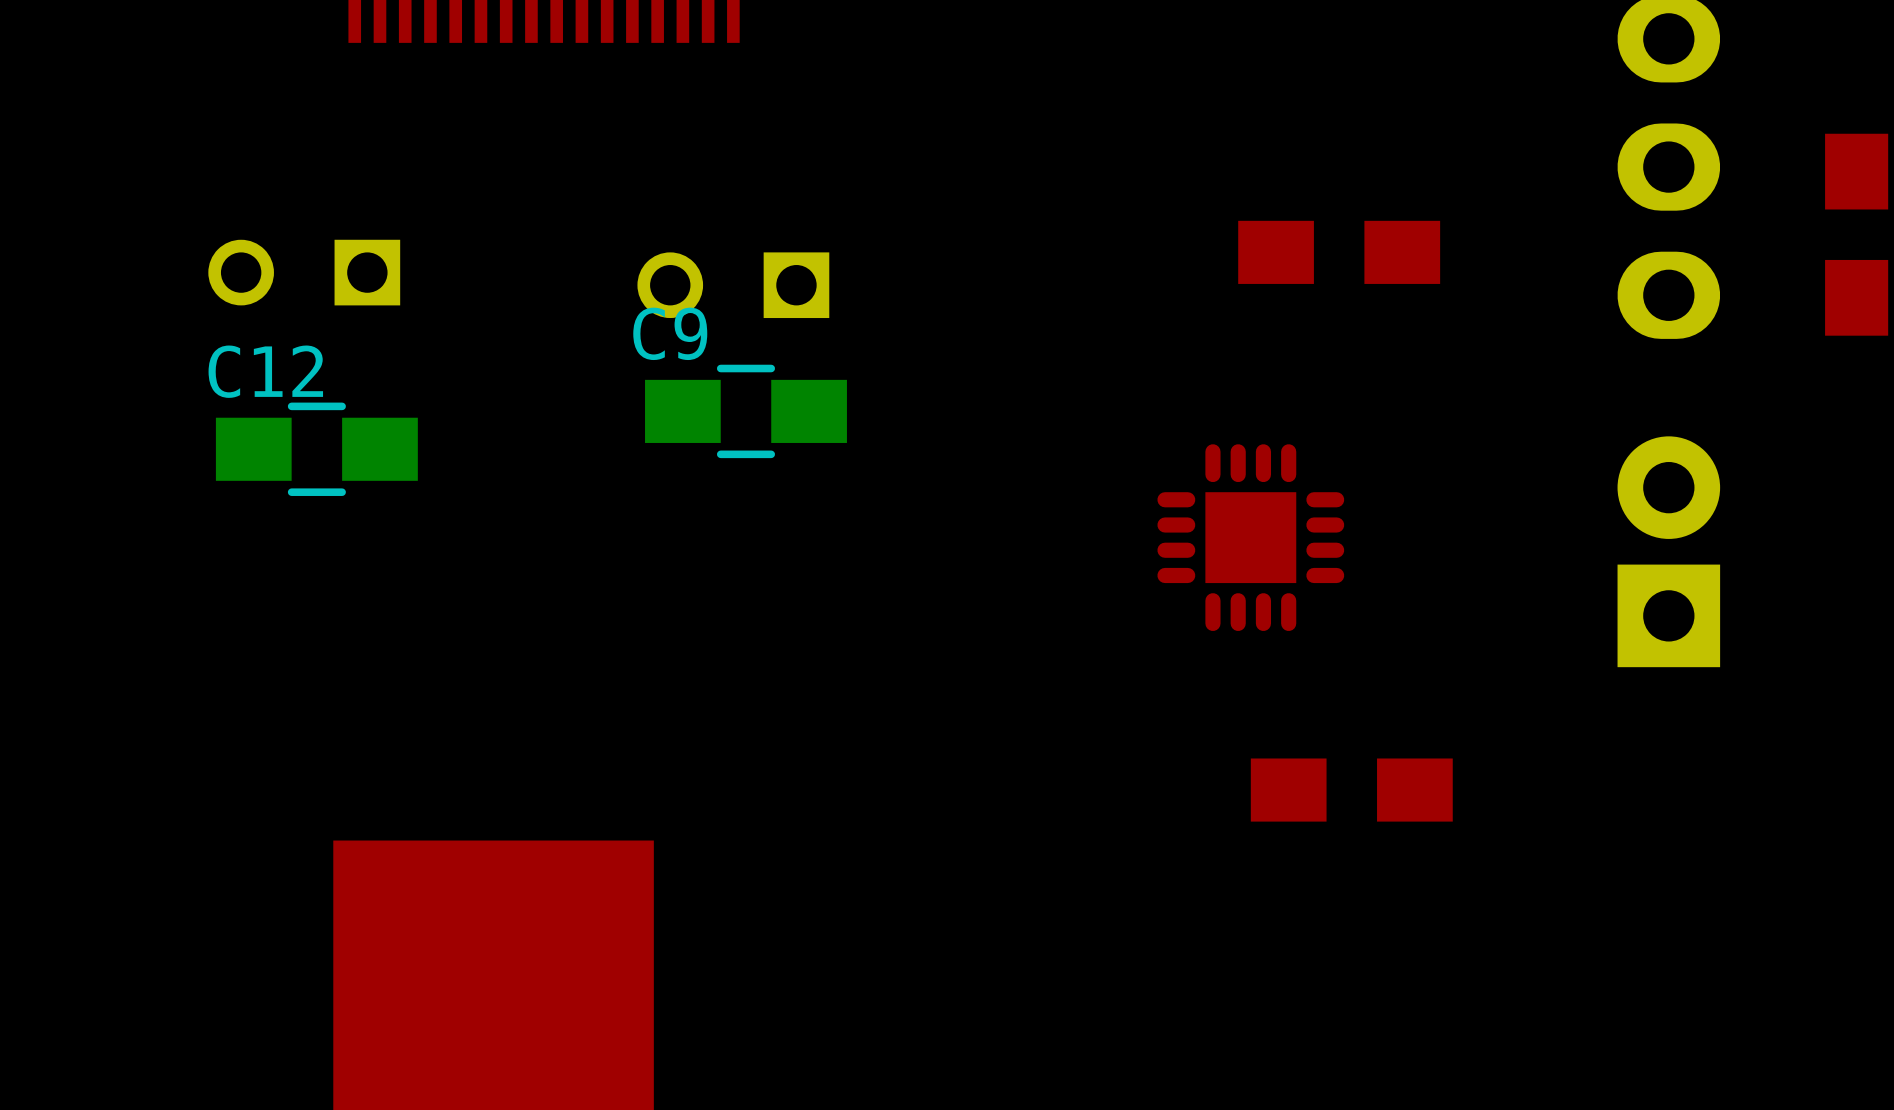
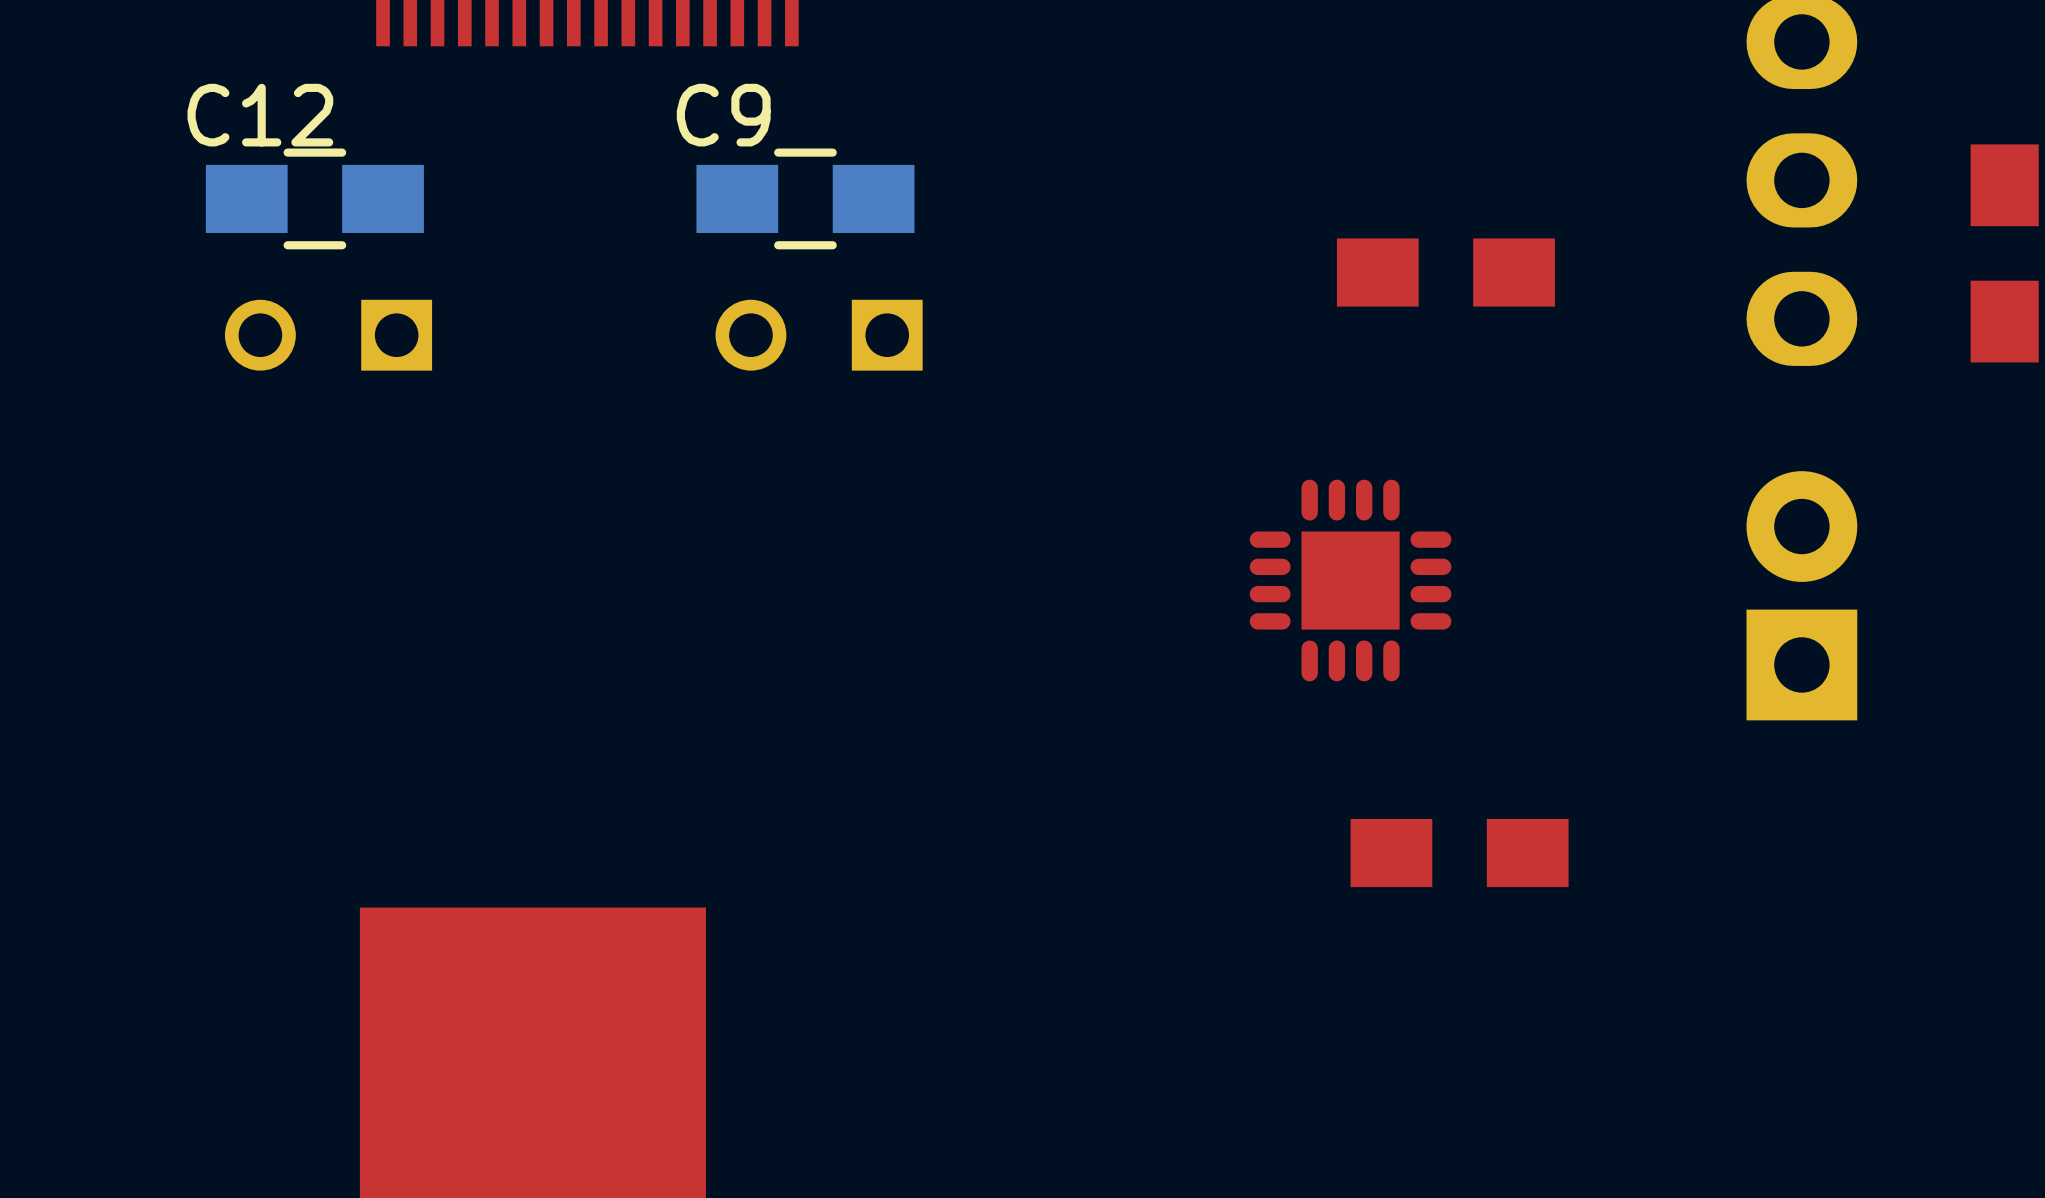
part position: (304, 272) -> (328, 335)
part position: (733, 285) -> (819, 335)
C9 position: (745, 411) -> (805, 198)
C12 position: (316, 449) -> (314, 198)

